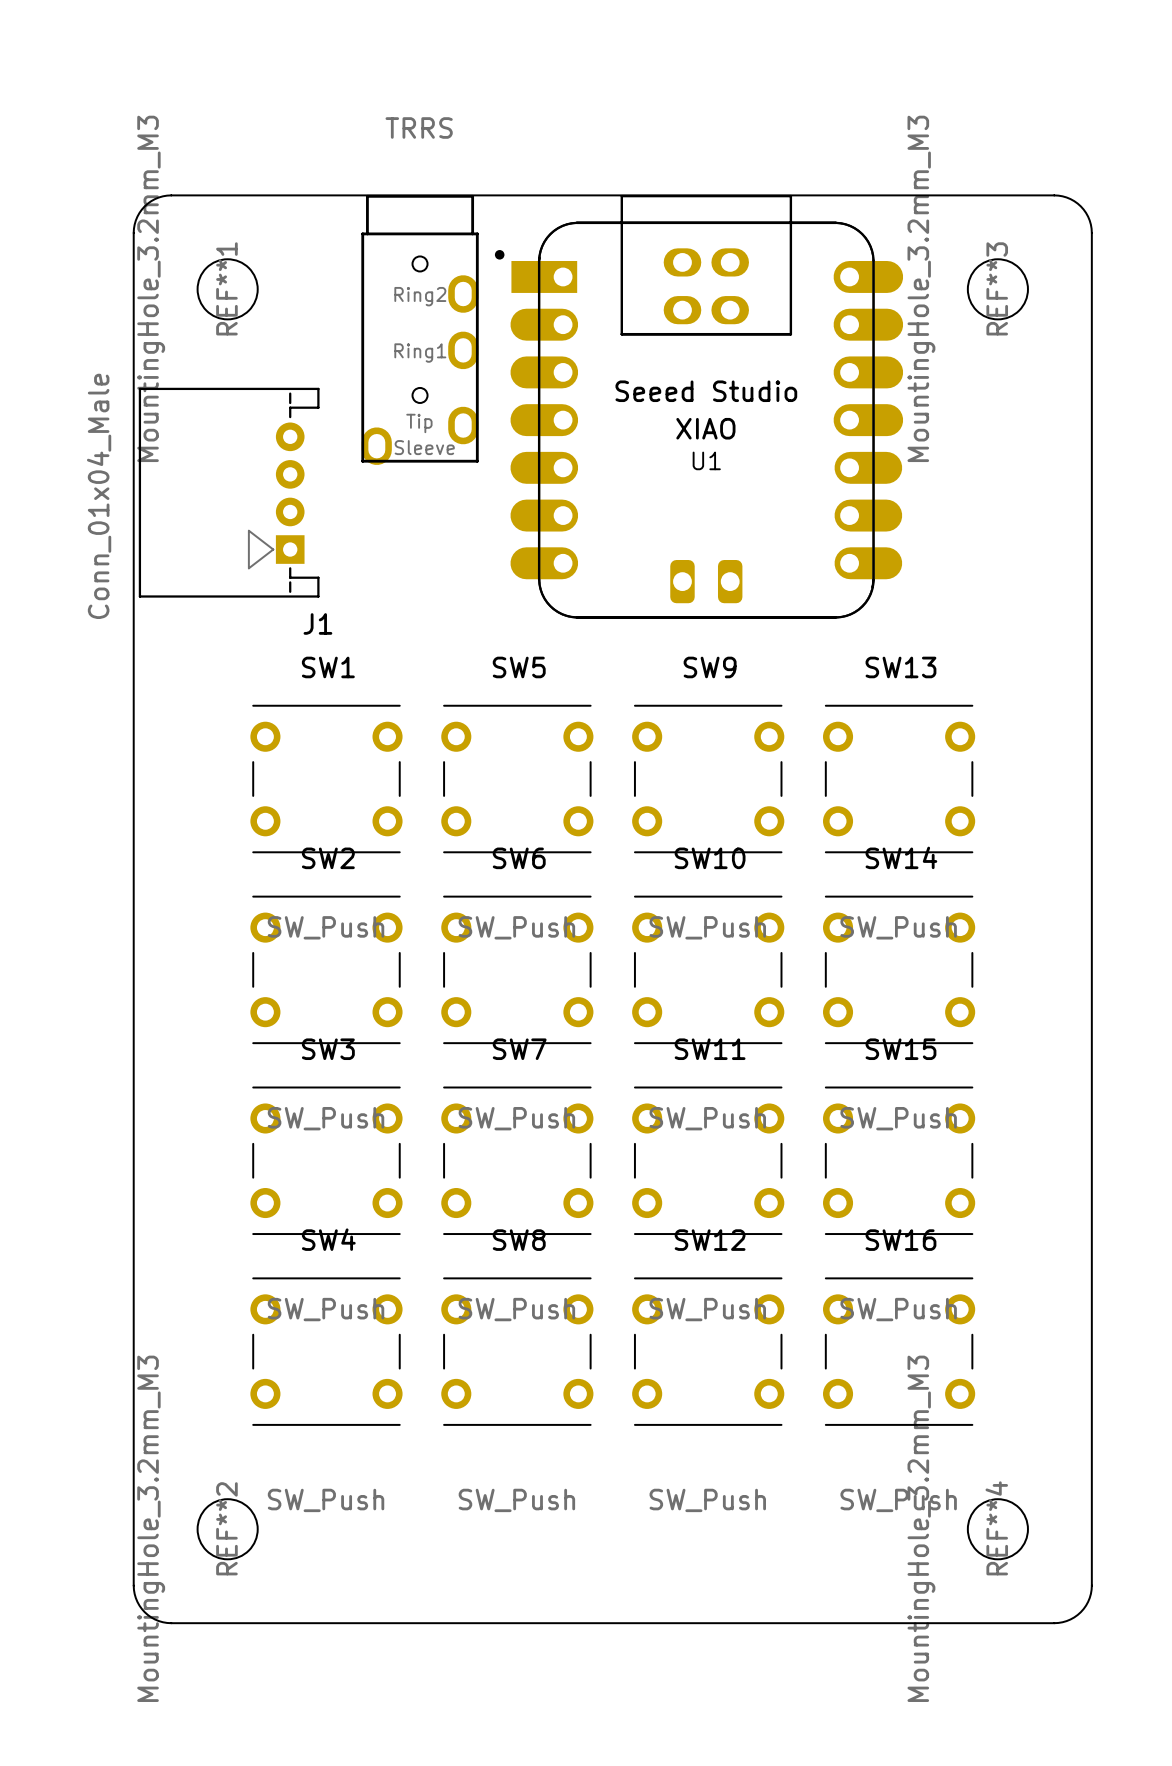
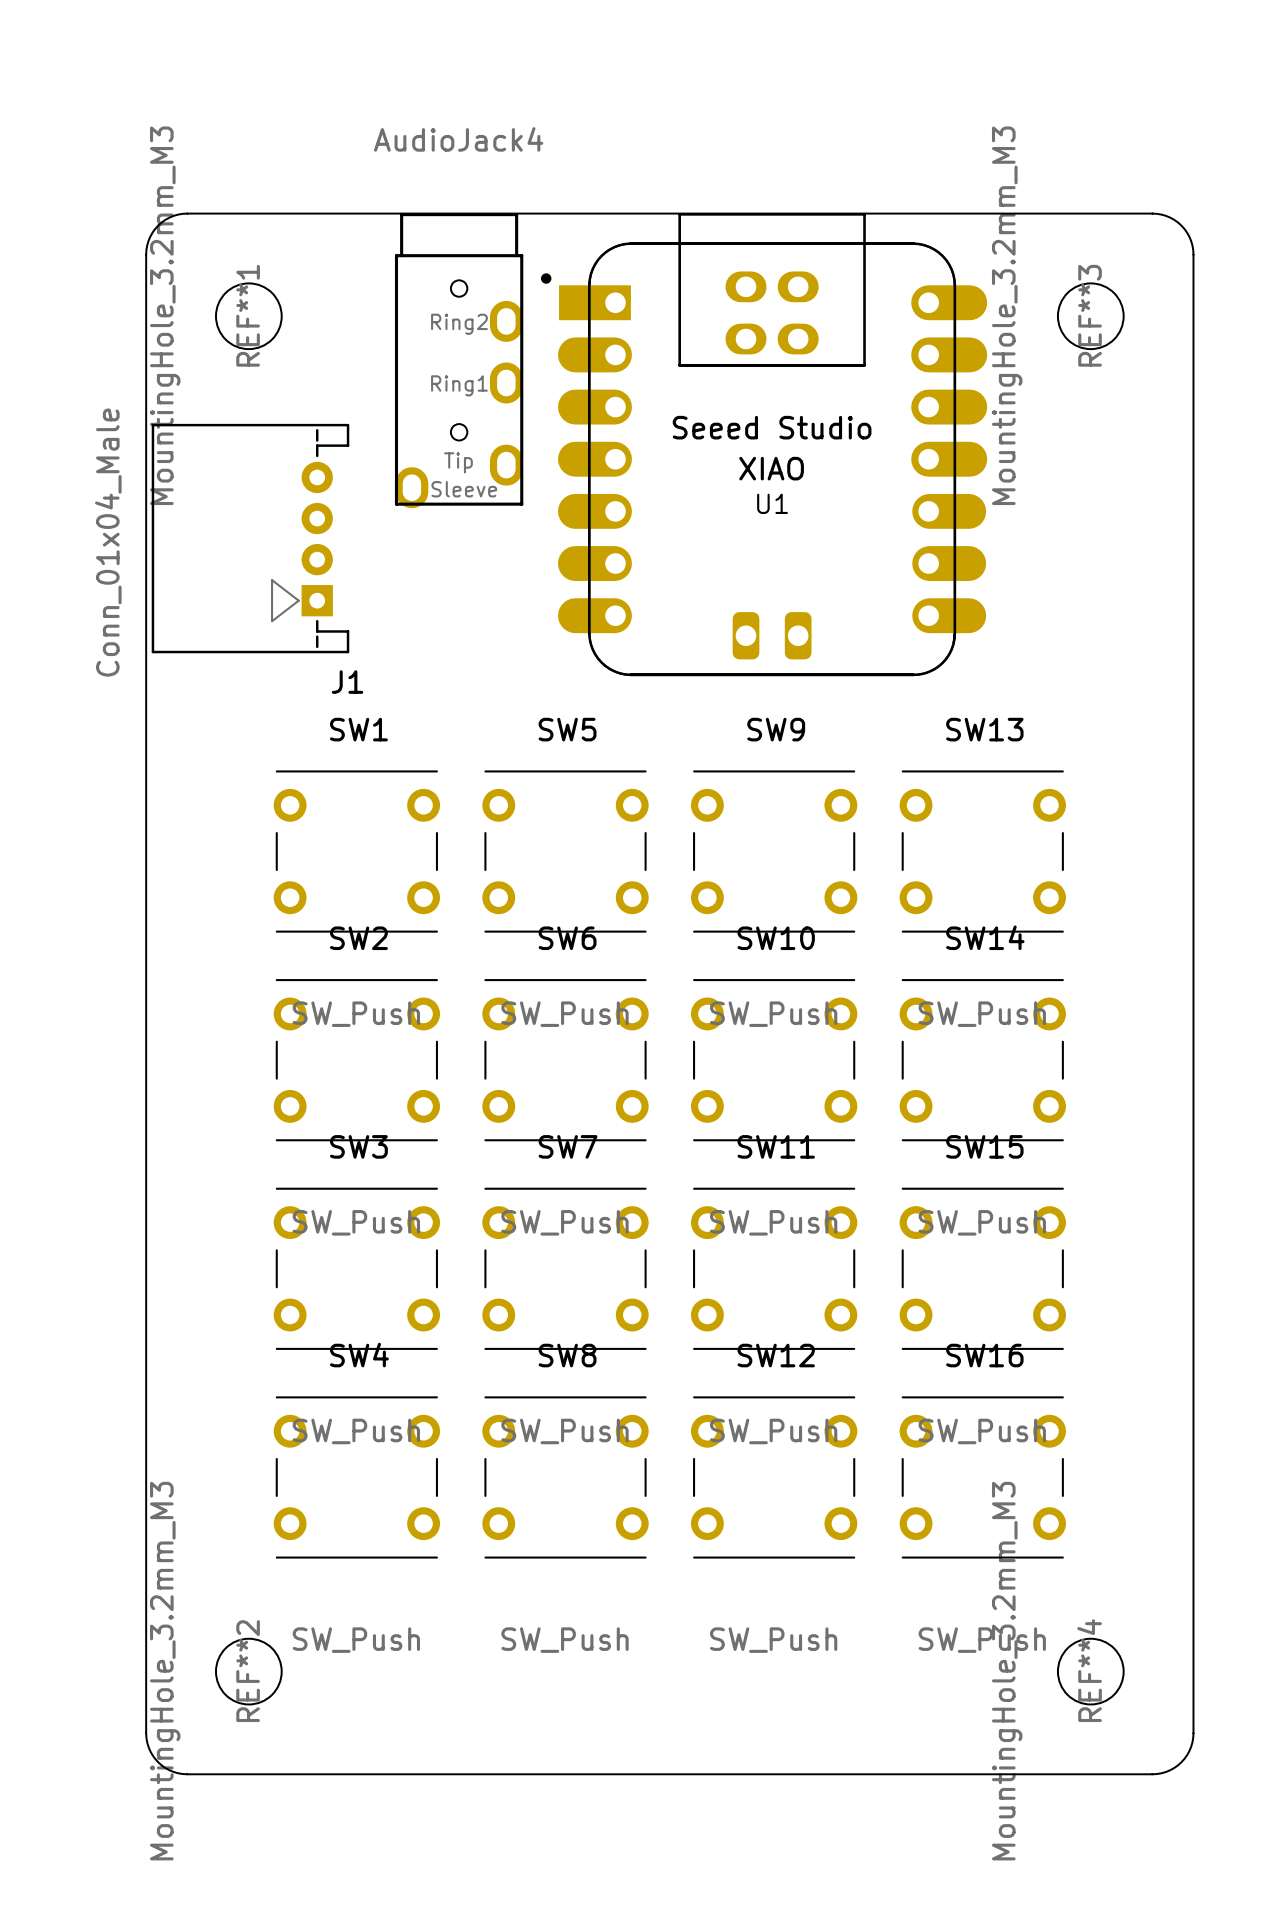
part value: TRRS (419, 127) -> AudioJack4 (458, 139)

